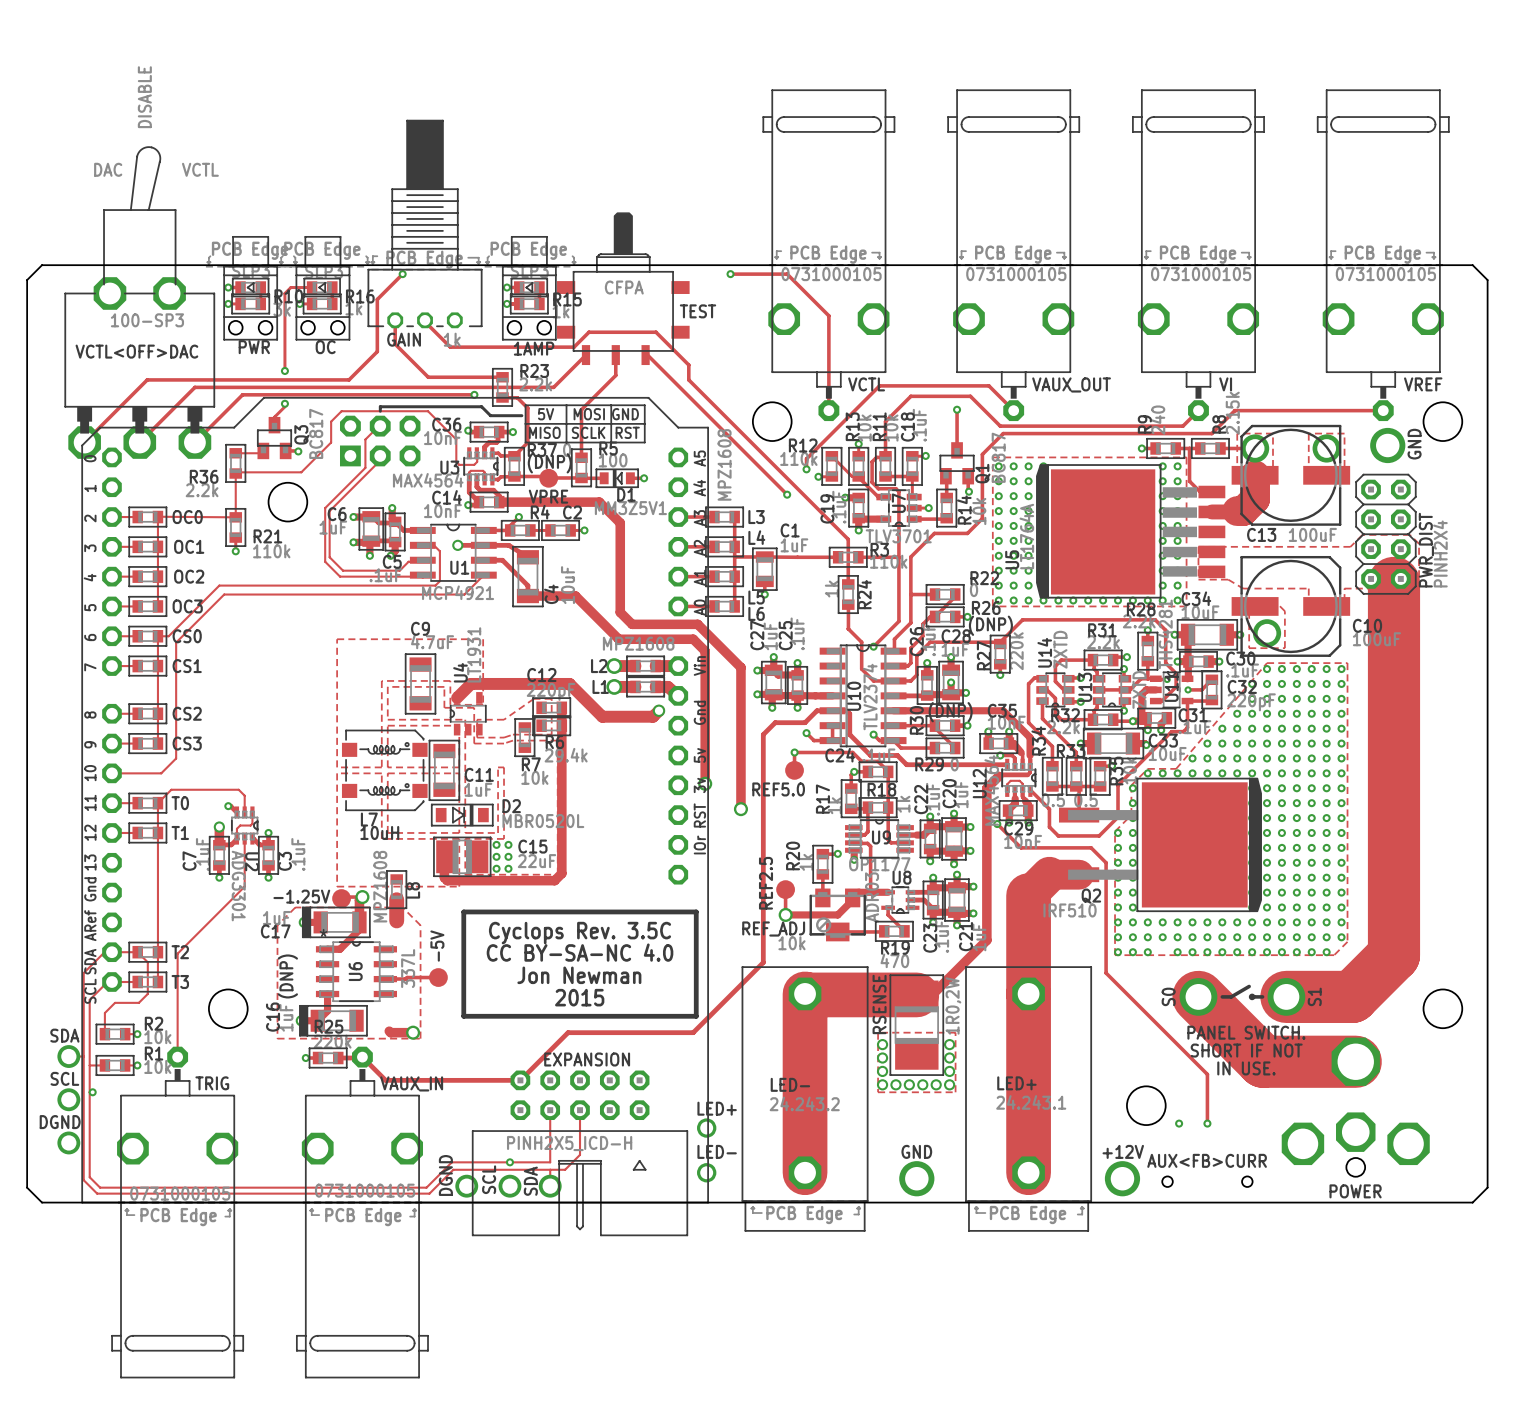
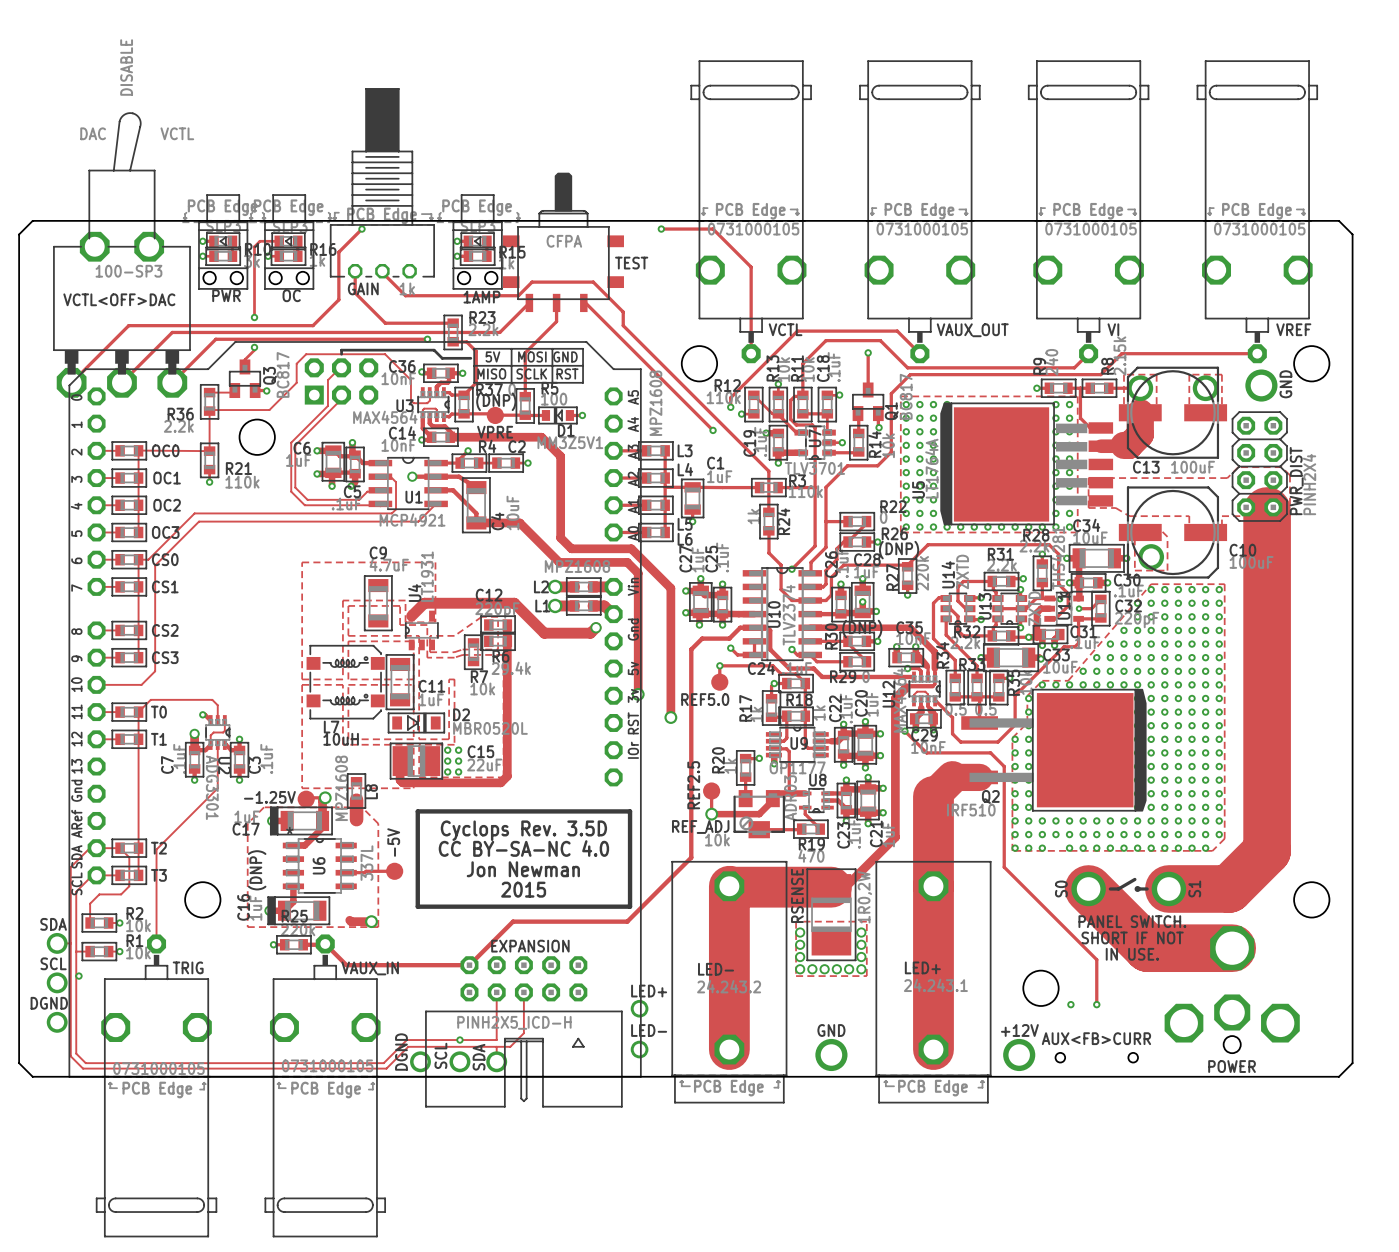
text: Cyclops Rev. 3.5C (580, 933) -> Cyclops Rev. 3.5D (523, 830)

